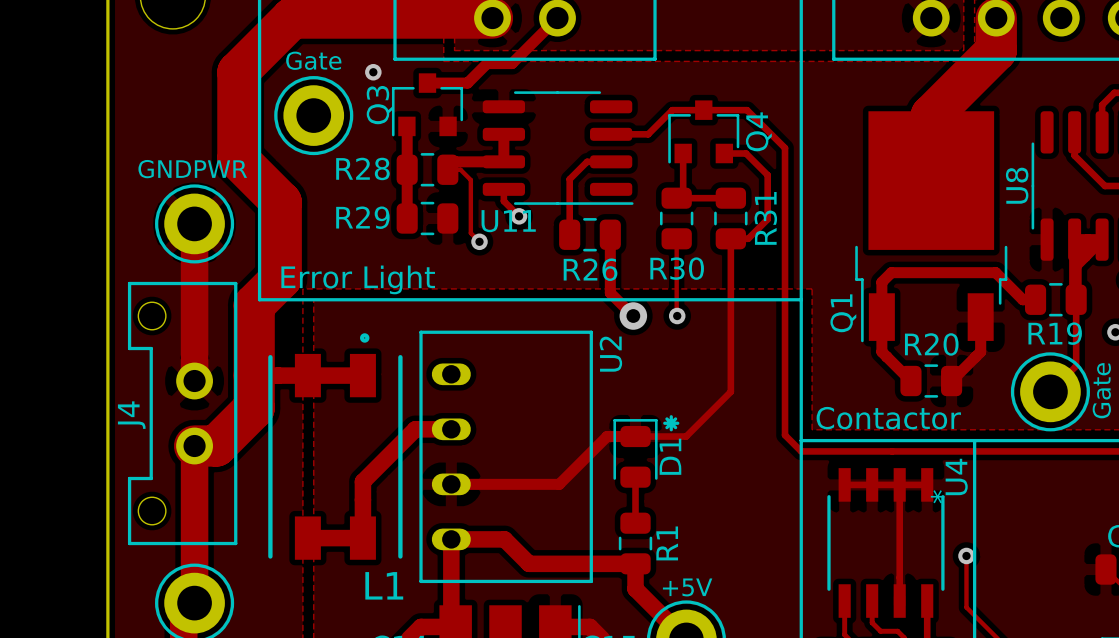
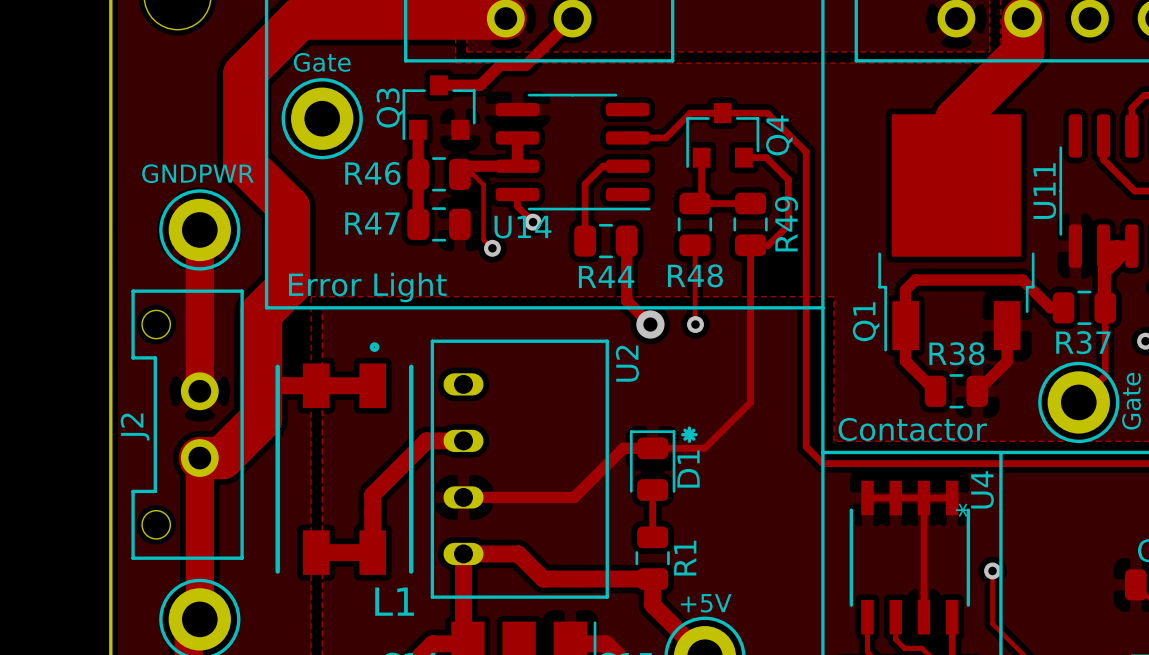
via: (373, 72) -> none
R28 name: R28 (362, 168) -> R46 (372, 173)
U8 name: U8 (1017, 185) -> U11 (1044, 191)
R29 name: R29 (362, 217) -> R47 (372, 223)
R31 name: R31 (765, 218) -> R49 (786, 223)
U11 name: U11 (508, 221) -> U14 (522, 227)
R30 name: R30 (677, 268) -> R48 (695, 275)
R26 name: R26 (590, 269) -> R44 (606, 276)
R19 name: R19 (1055, 333) -> R37 (1083, 342)
R20 name: R20 (931, 344) -> R38 (956, 353)
J4 name: J4 (131, 415) -> J2 (135, 426)

